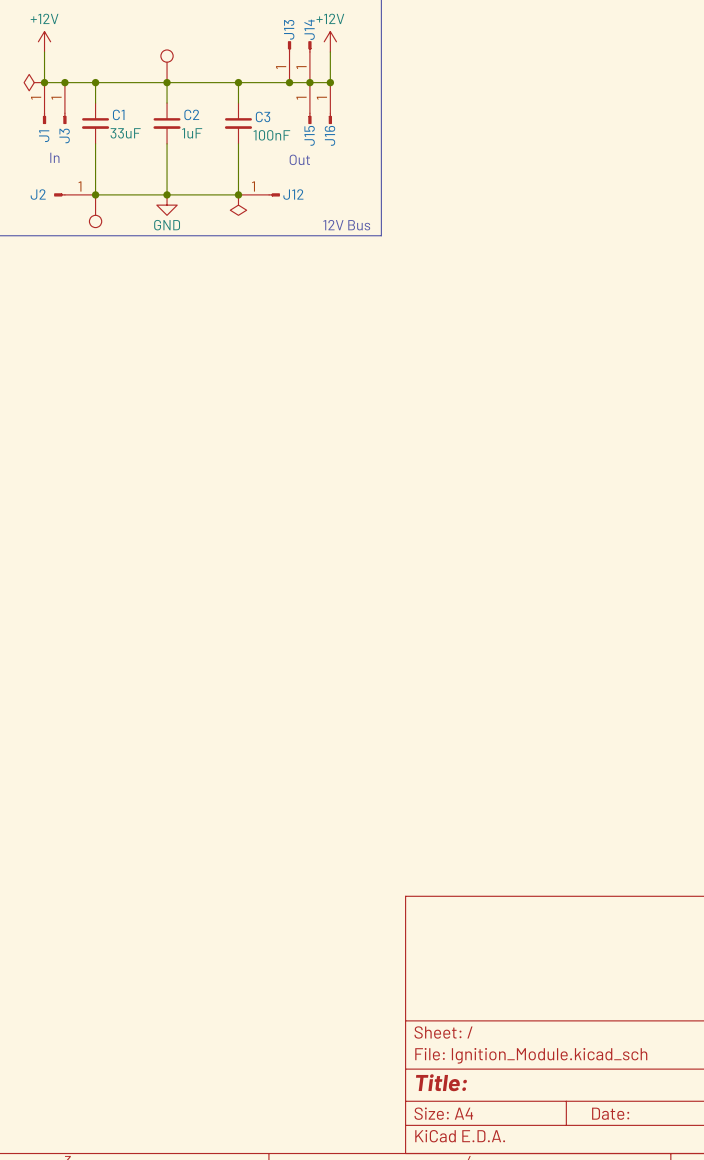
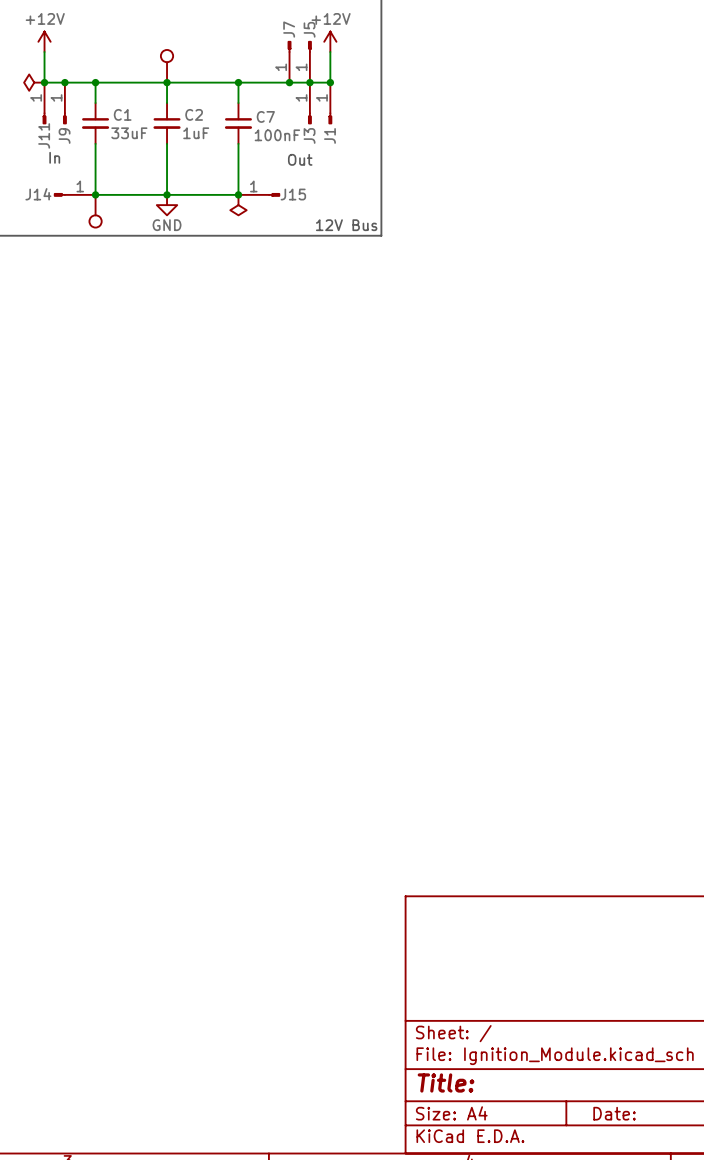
J13 name: J13 (289, 29) -> J7 (289, 29)
J14 name: J14 (309, 29) -> J5 (309, 29)
C3 name: C3 (263, 116) -> C7 (265, 116)
J3 name: J3 (64, 135) -> J9 (64, 135)
J15 name: J15 (309, 135) -> J3 (309, 135)
J16 name: J16 (329, 135) -> J1 (329, 135)
J1 name: J1 (44, 136) -> J11 (44, 135)
J2 name: J2 (38, 194) -> J14 (38, 194)
J12 name: J12 (293, 194) -> J15 (293, 194)

